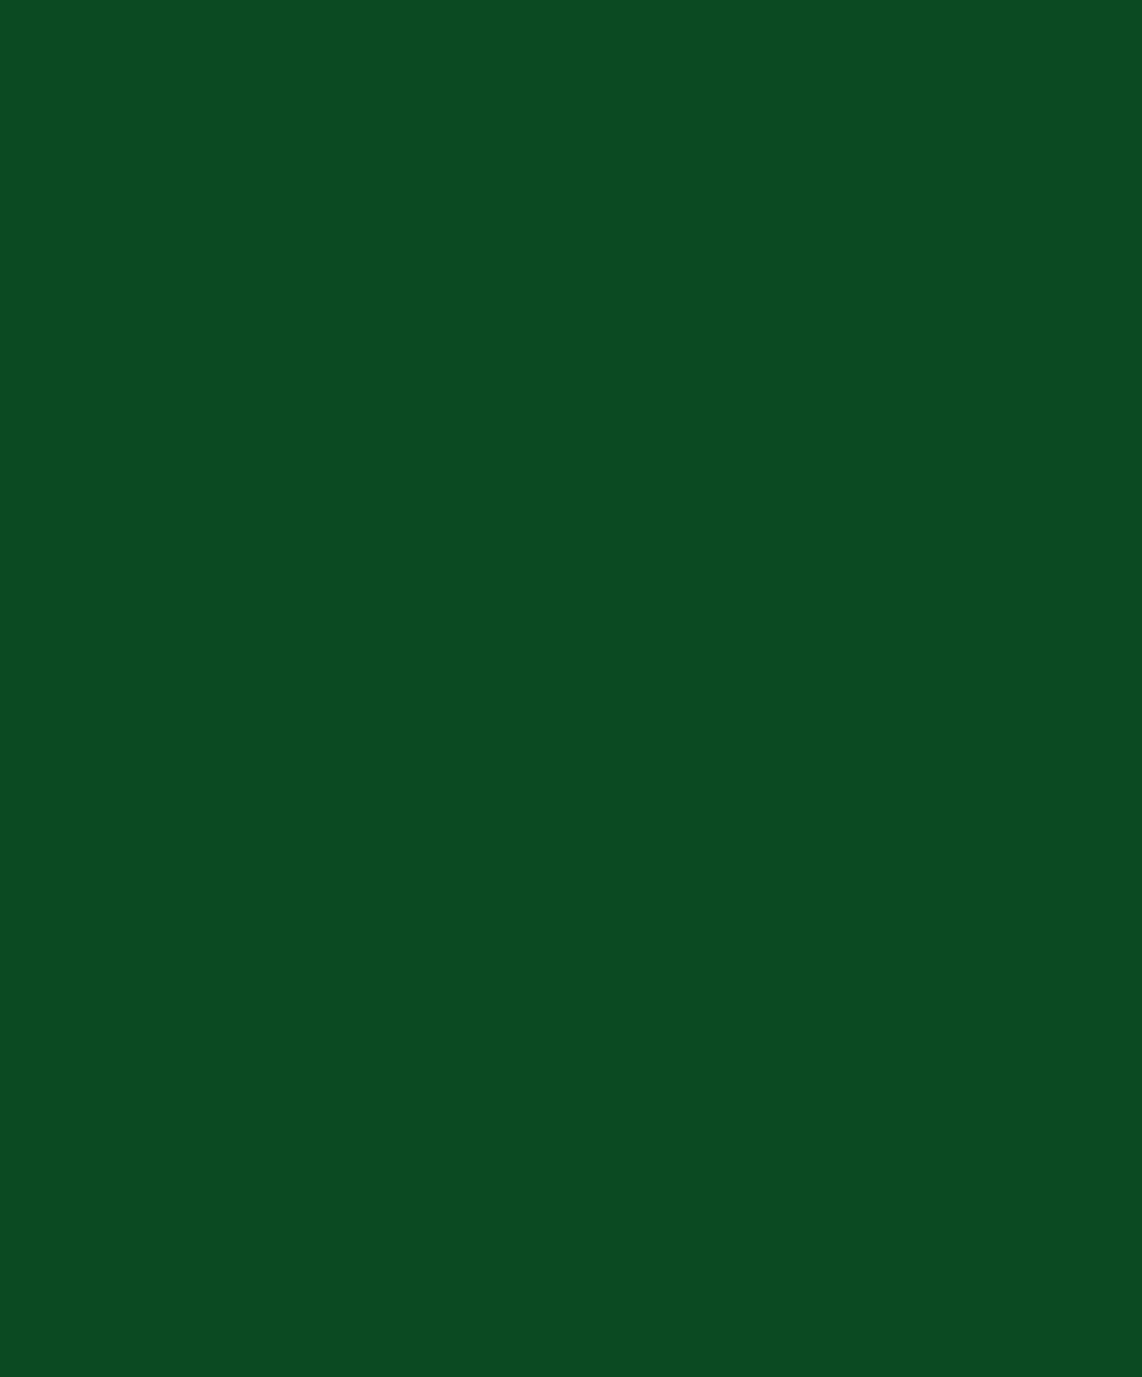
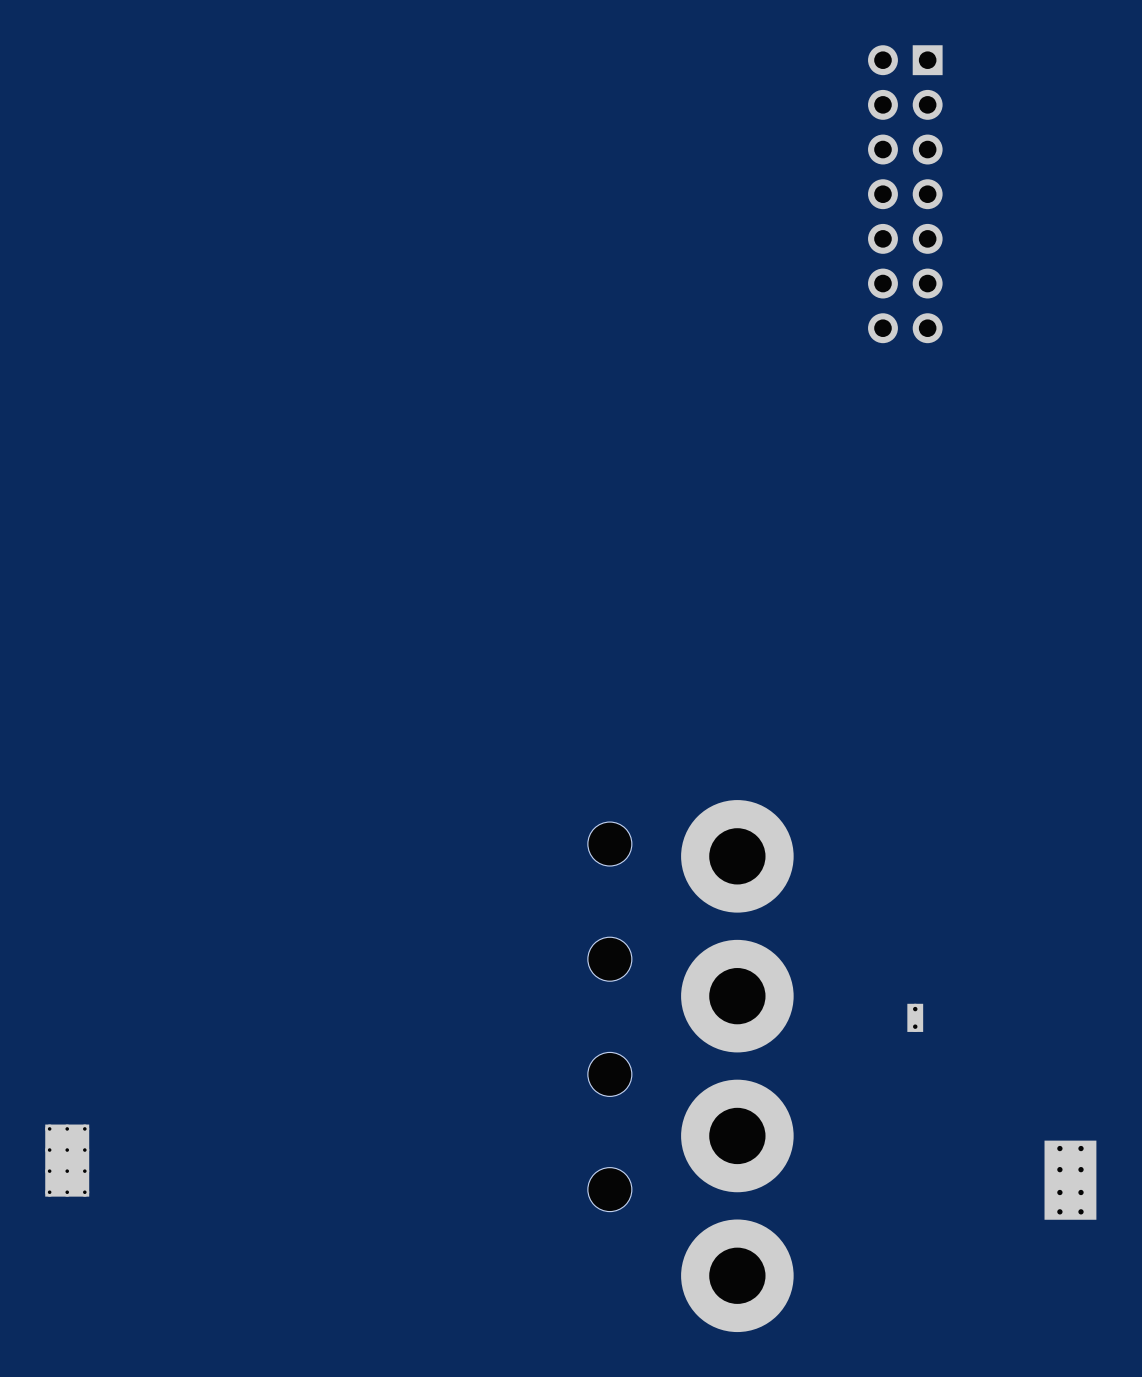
part: none -> (905, 194)
part: none -> (609, 844)
part: none -> (737, 856)
part: none -> (609, 959)
part: none -> (737, 996)
part: none -> (915, 1017)
part: none -> (609, 1074)
part: none -> (737, 1135)
part: none -> (67, 1160)
part: none -> (1070, 1180)
part: none -> (609, 1189)
part: none -> (737, 1275)

